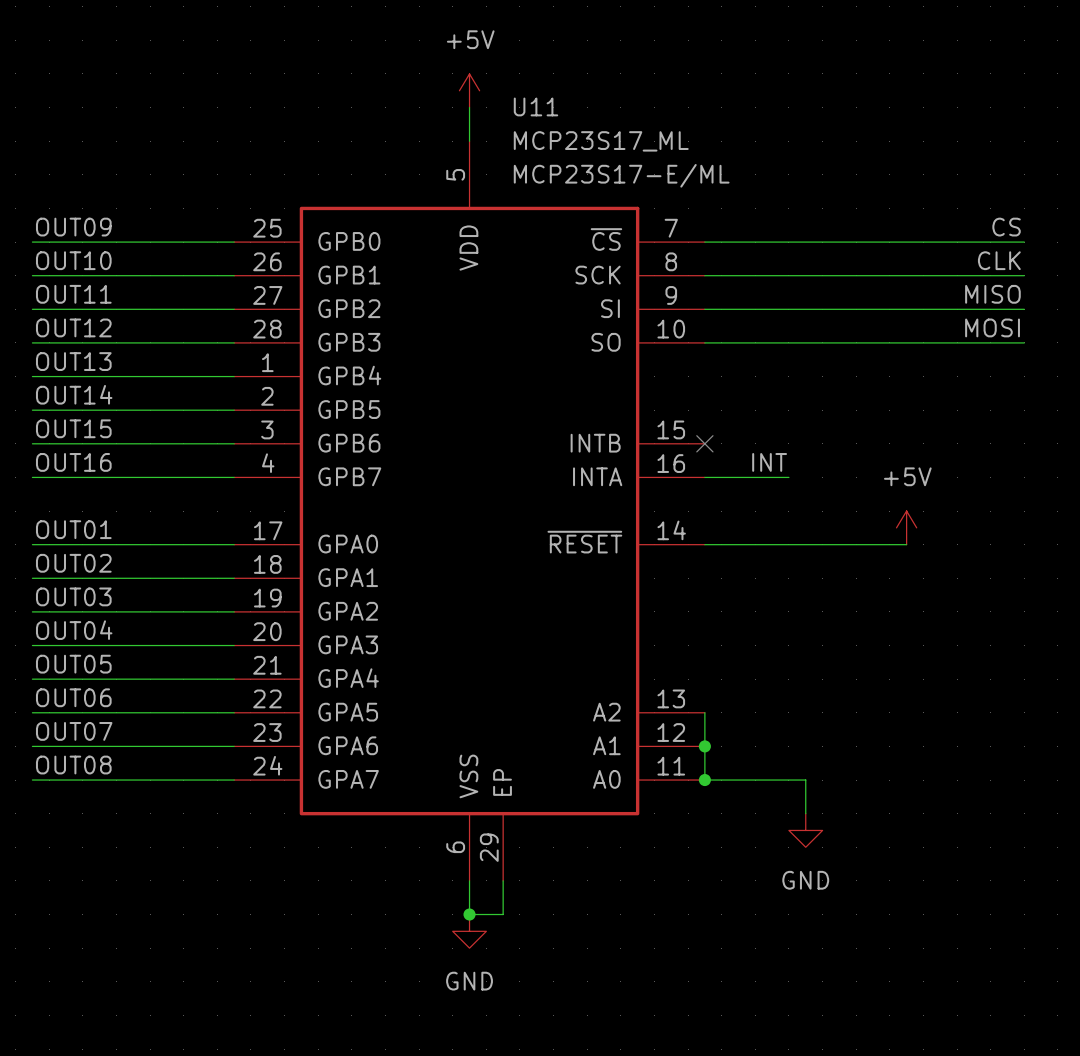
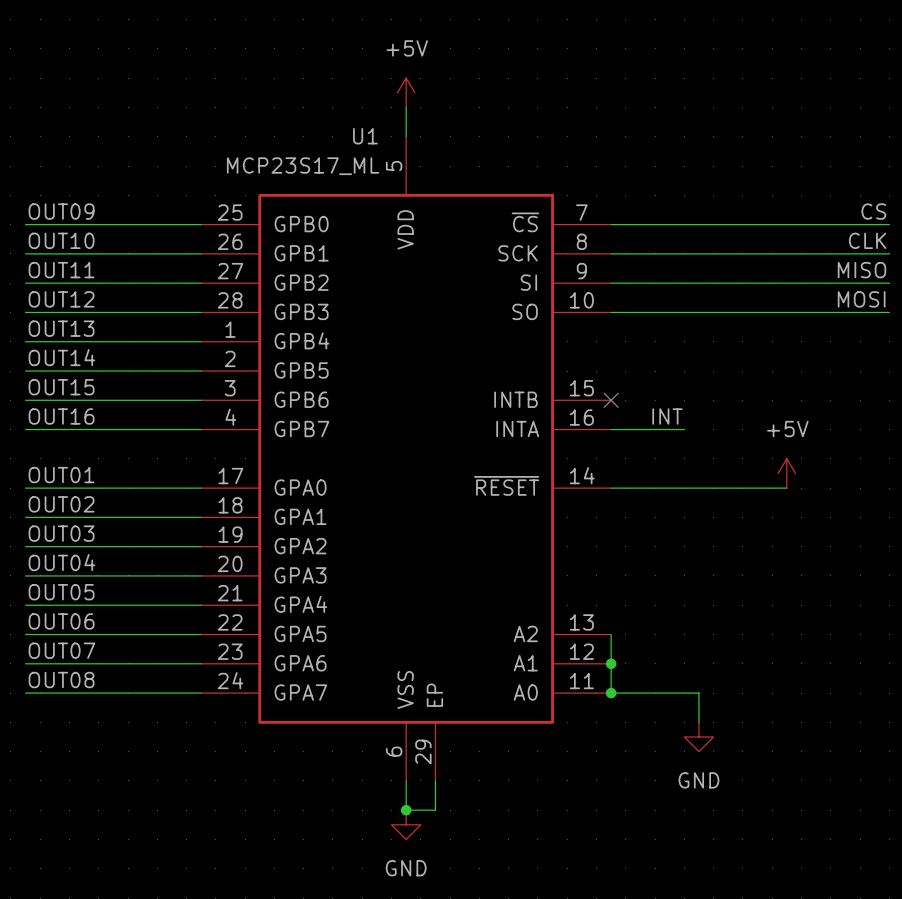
U11 name: U11 (536, 106) -> U1 (365, 136)
U11 value position: MCP23S17_ML (601, 141) -> MCP23S17_ML (303, 166)
U11 text: MCP23S17-E/ML (621, 175) -> none

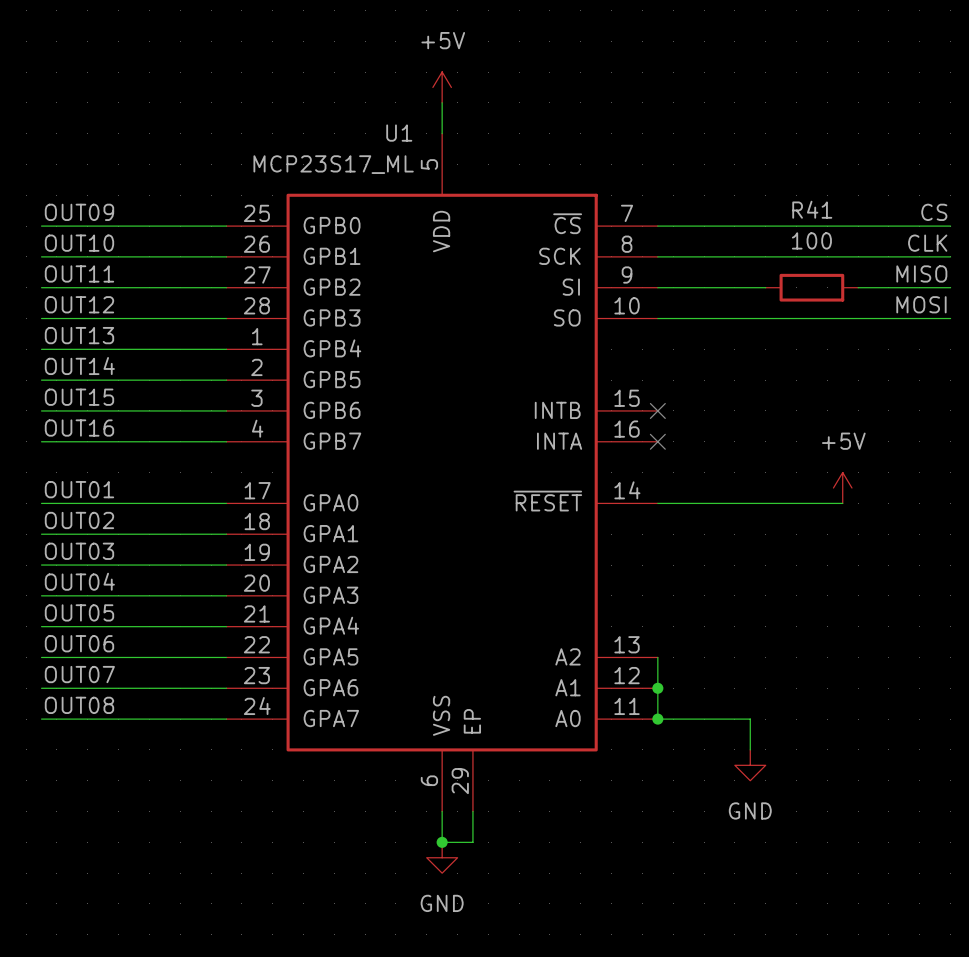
wire: (713, 283) (801, 283) -> none
R41: none -> 100 (811, 287)
label: INT (667, 416) -> none
wire: (611, 429) (684, 429) -> none
no-connect mark: none -> (657, 441)

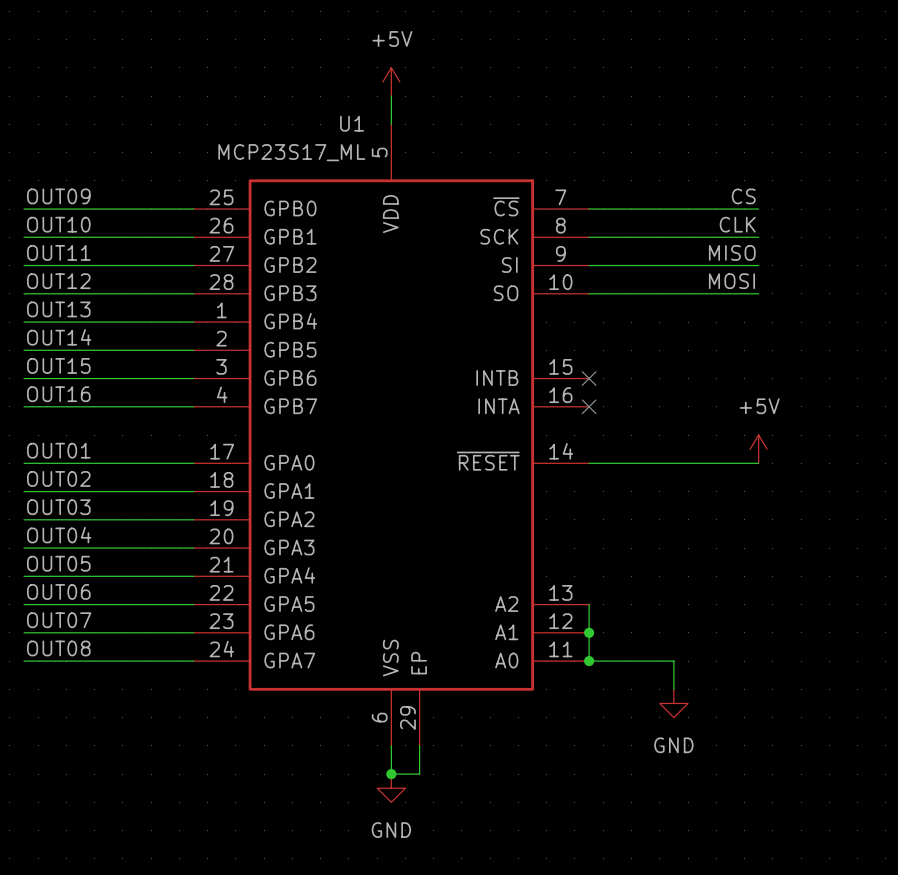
label position: CS (934, 212) -> CS (743, 196)
wire: (842, 226) (950, 226) -> none
label position: CLK (927, 243) -> CLK (737, 224)
wire: (842, 256) (950, 256) -> none
label position: MISO (921, 273) -> MISO (732, 252)
wire: none -> (688, 265) (758, 265)
R41: 100 (811, 287) -> none
wire: (858, 287) (950, 287) -> none
label position: MOSI (921, 304) -> MOSI (731, 281)
wire: (842, 318) (950, 318) -> none

